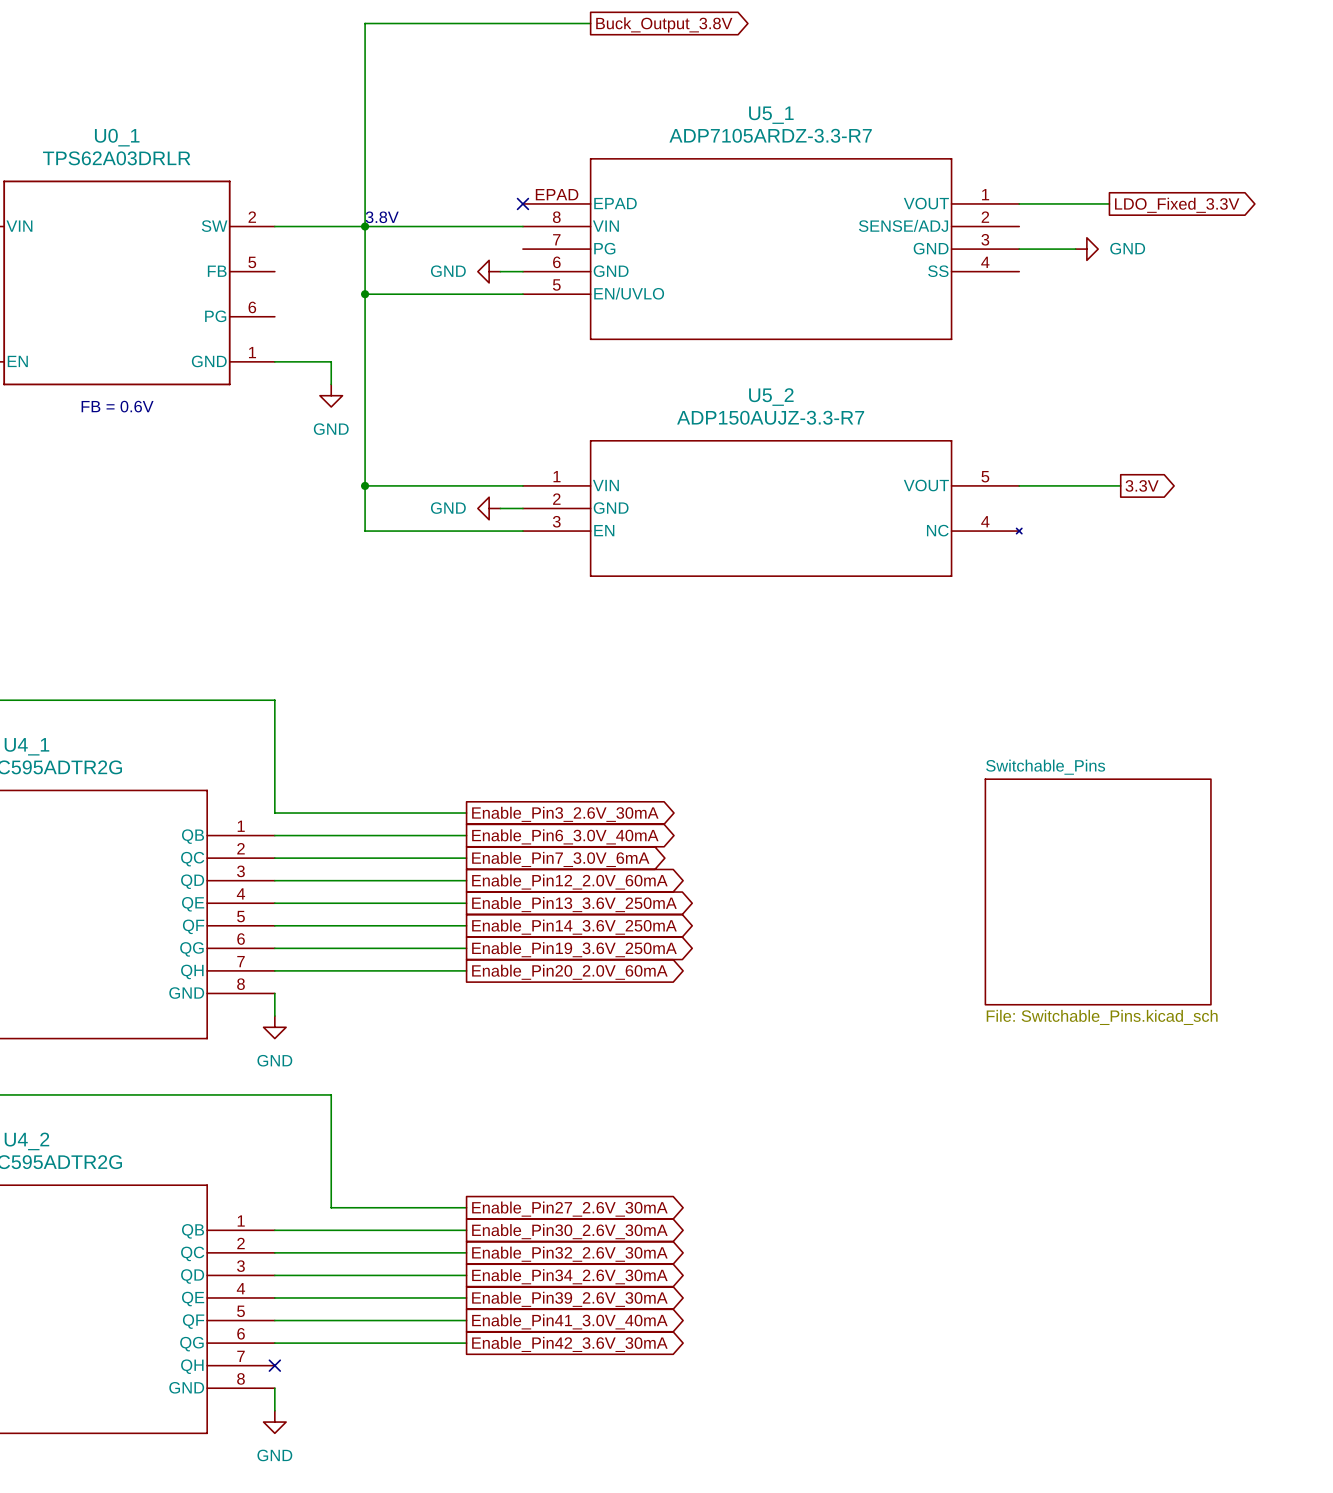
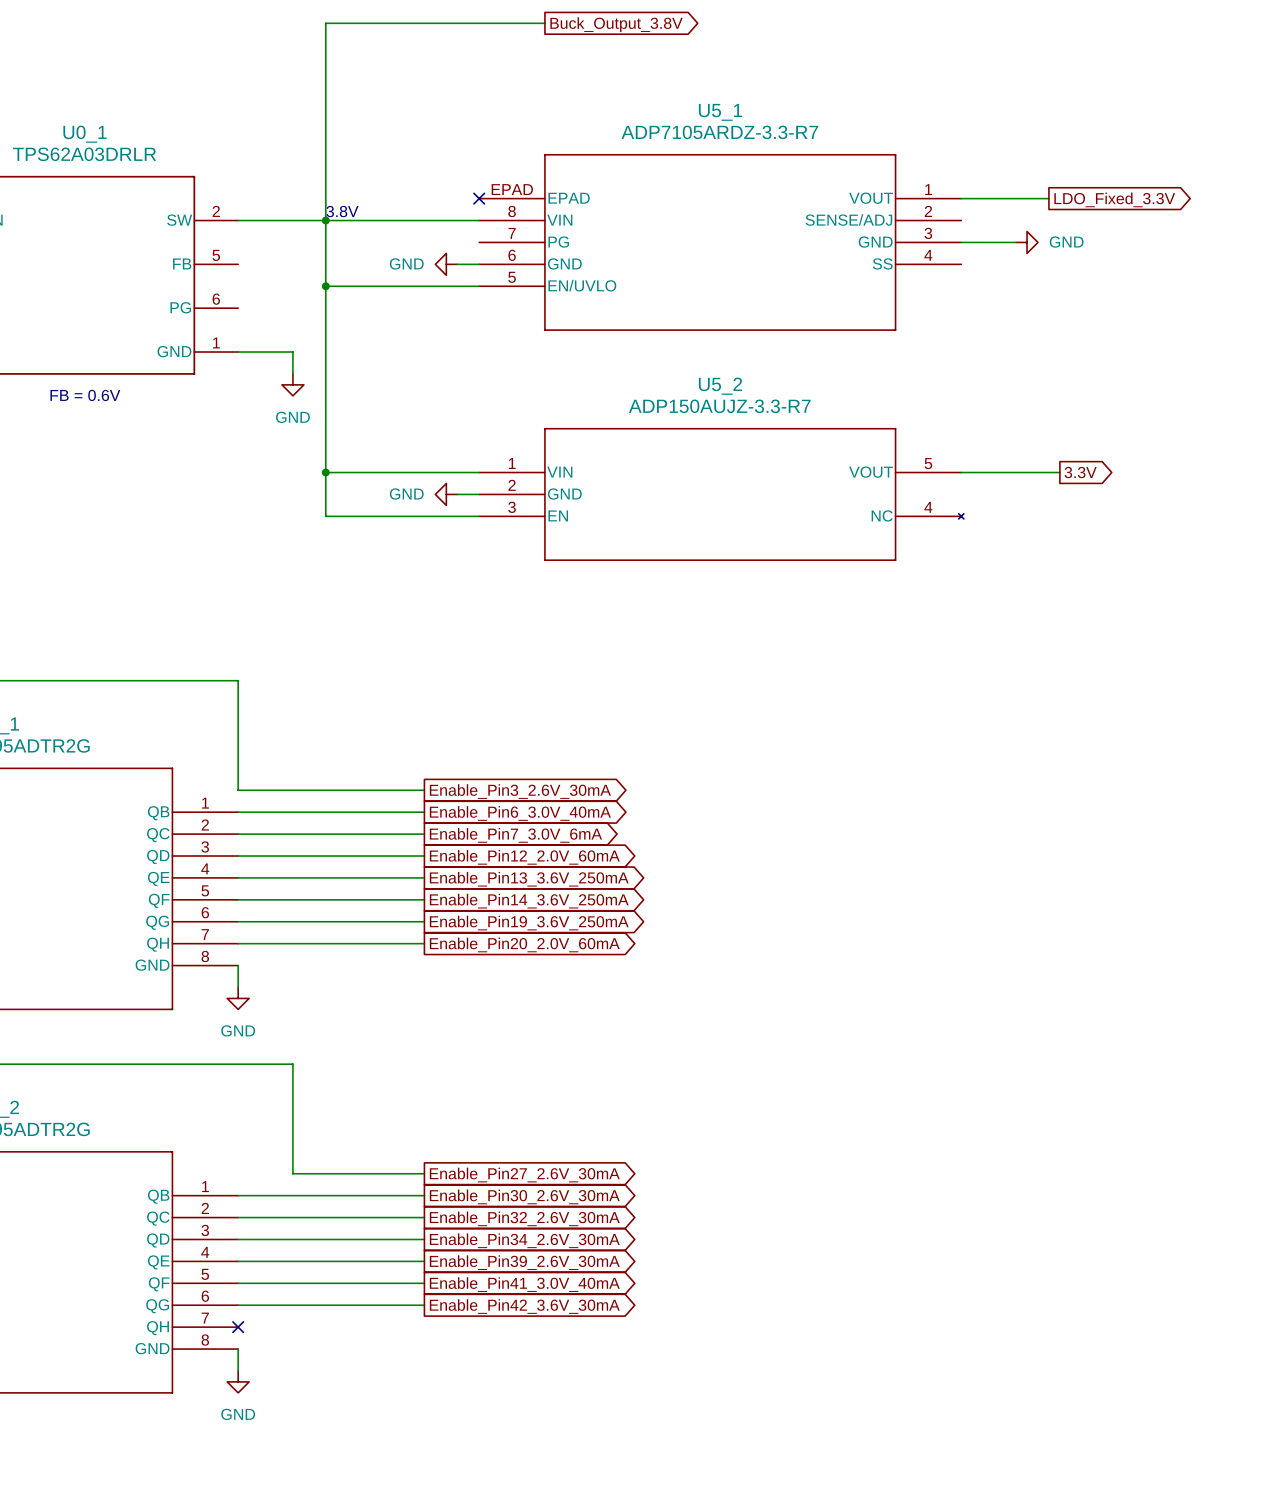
sheet Switchable_Pins: File: Switchable_Pins.kicad_sch (1098, 891) -> none

